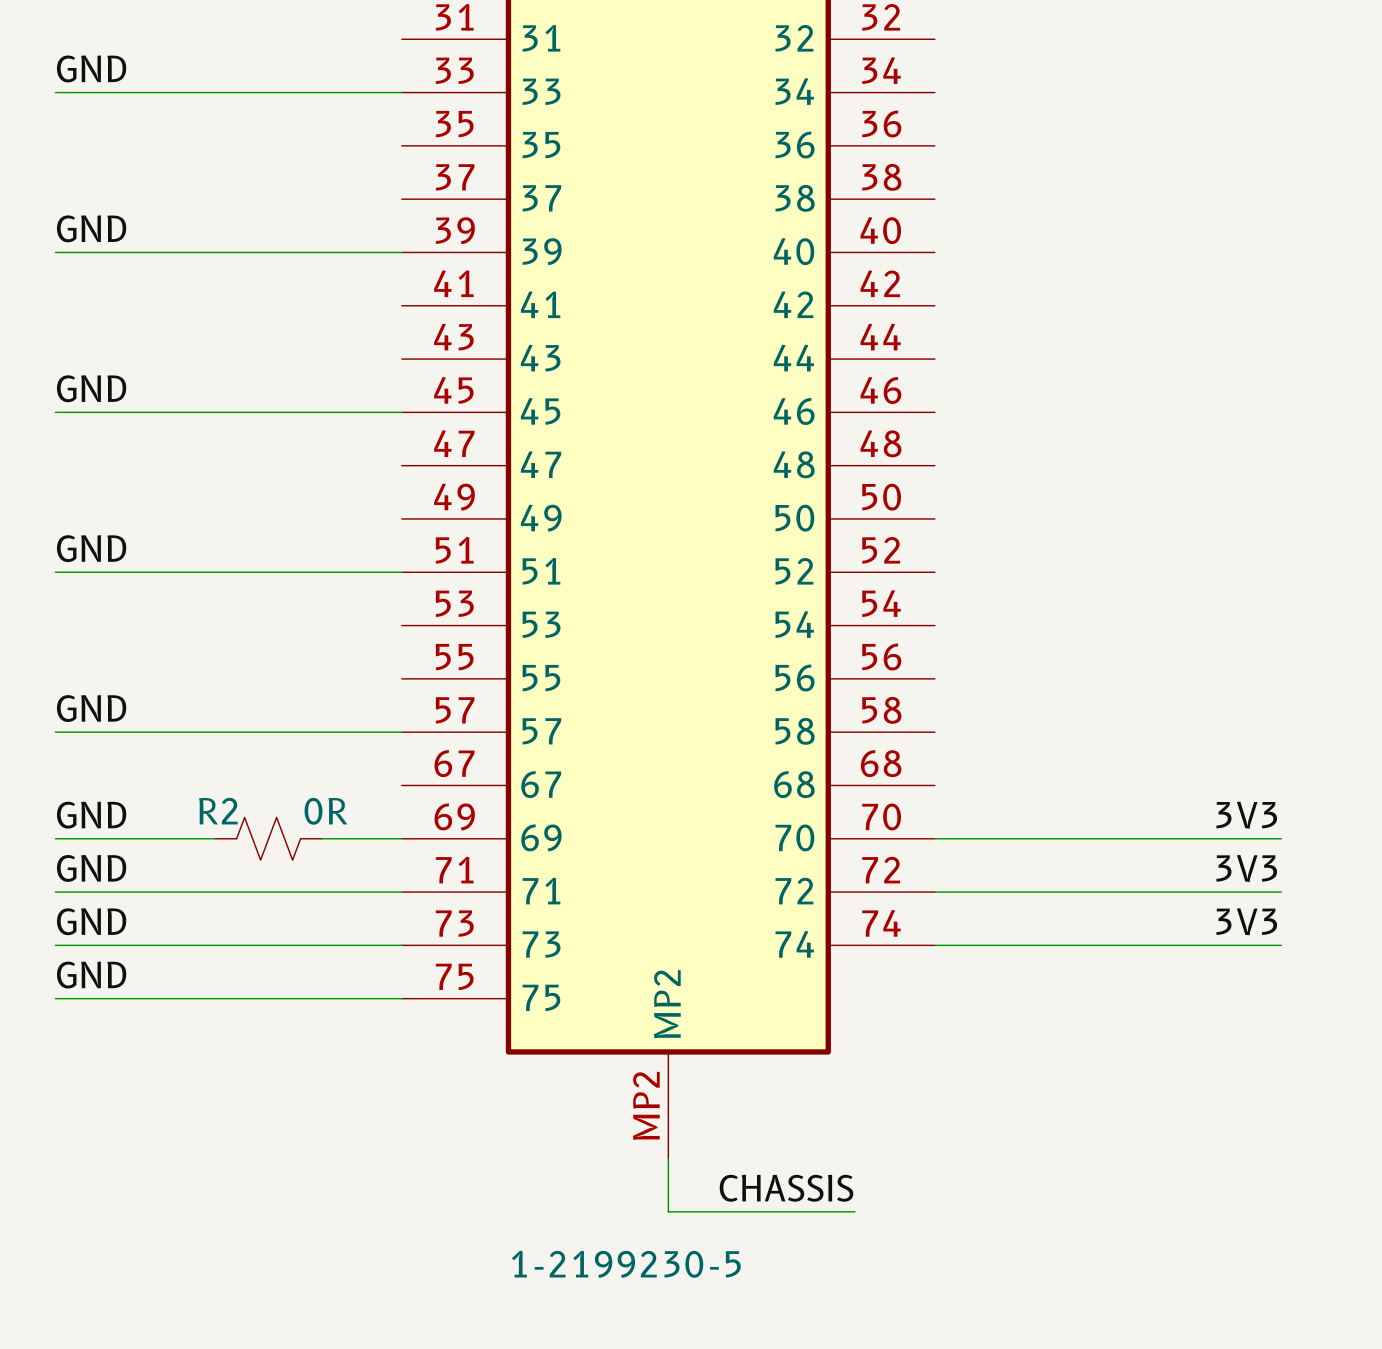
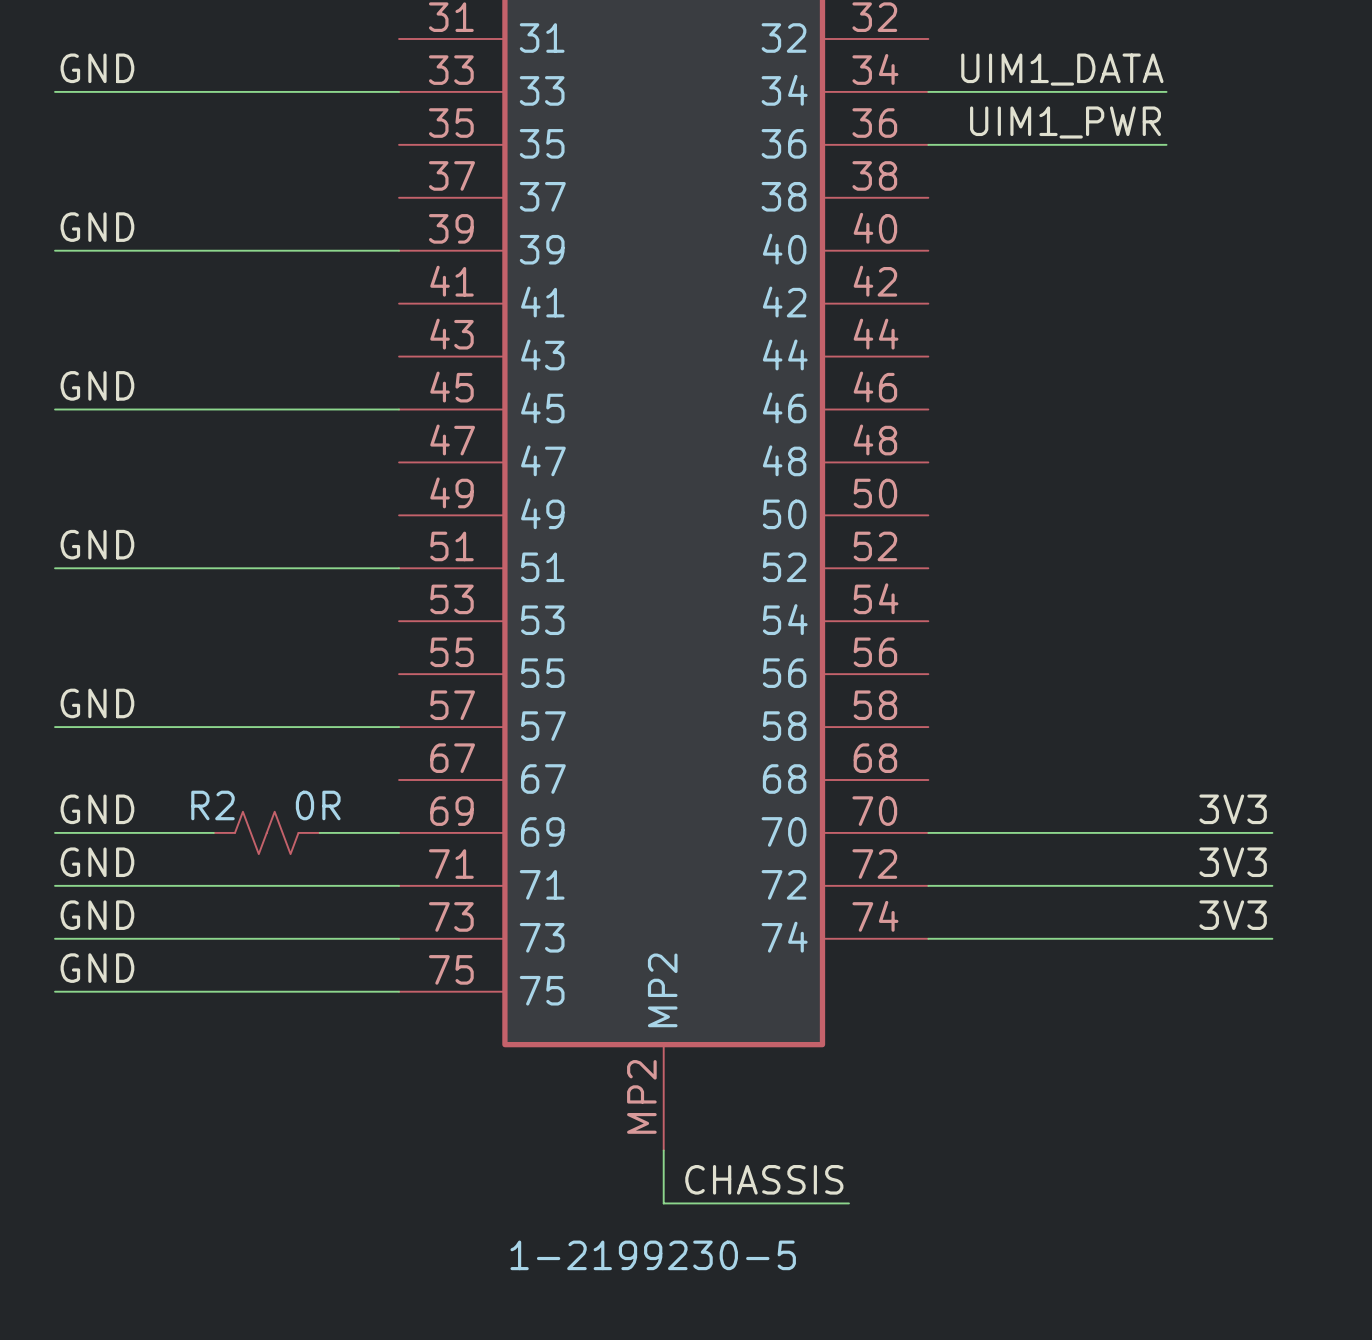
label: none -> UIM1_DATA (1062, 69)
wire: none -> (928, 91) (1166, 91)
label: none -> UIM1_PWR (1065, 122)
wire: none -> (928, 144) (1166, 144)

